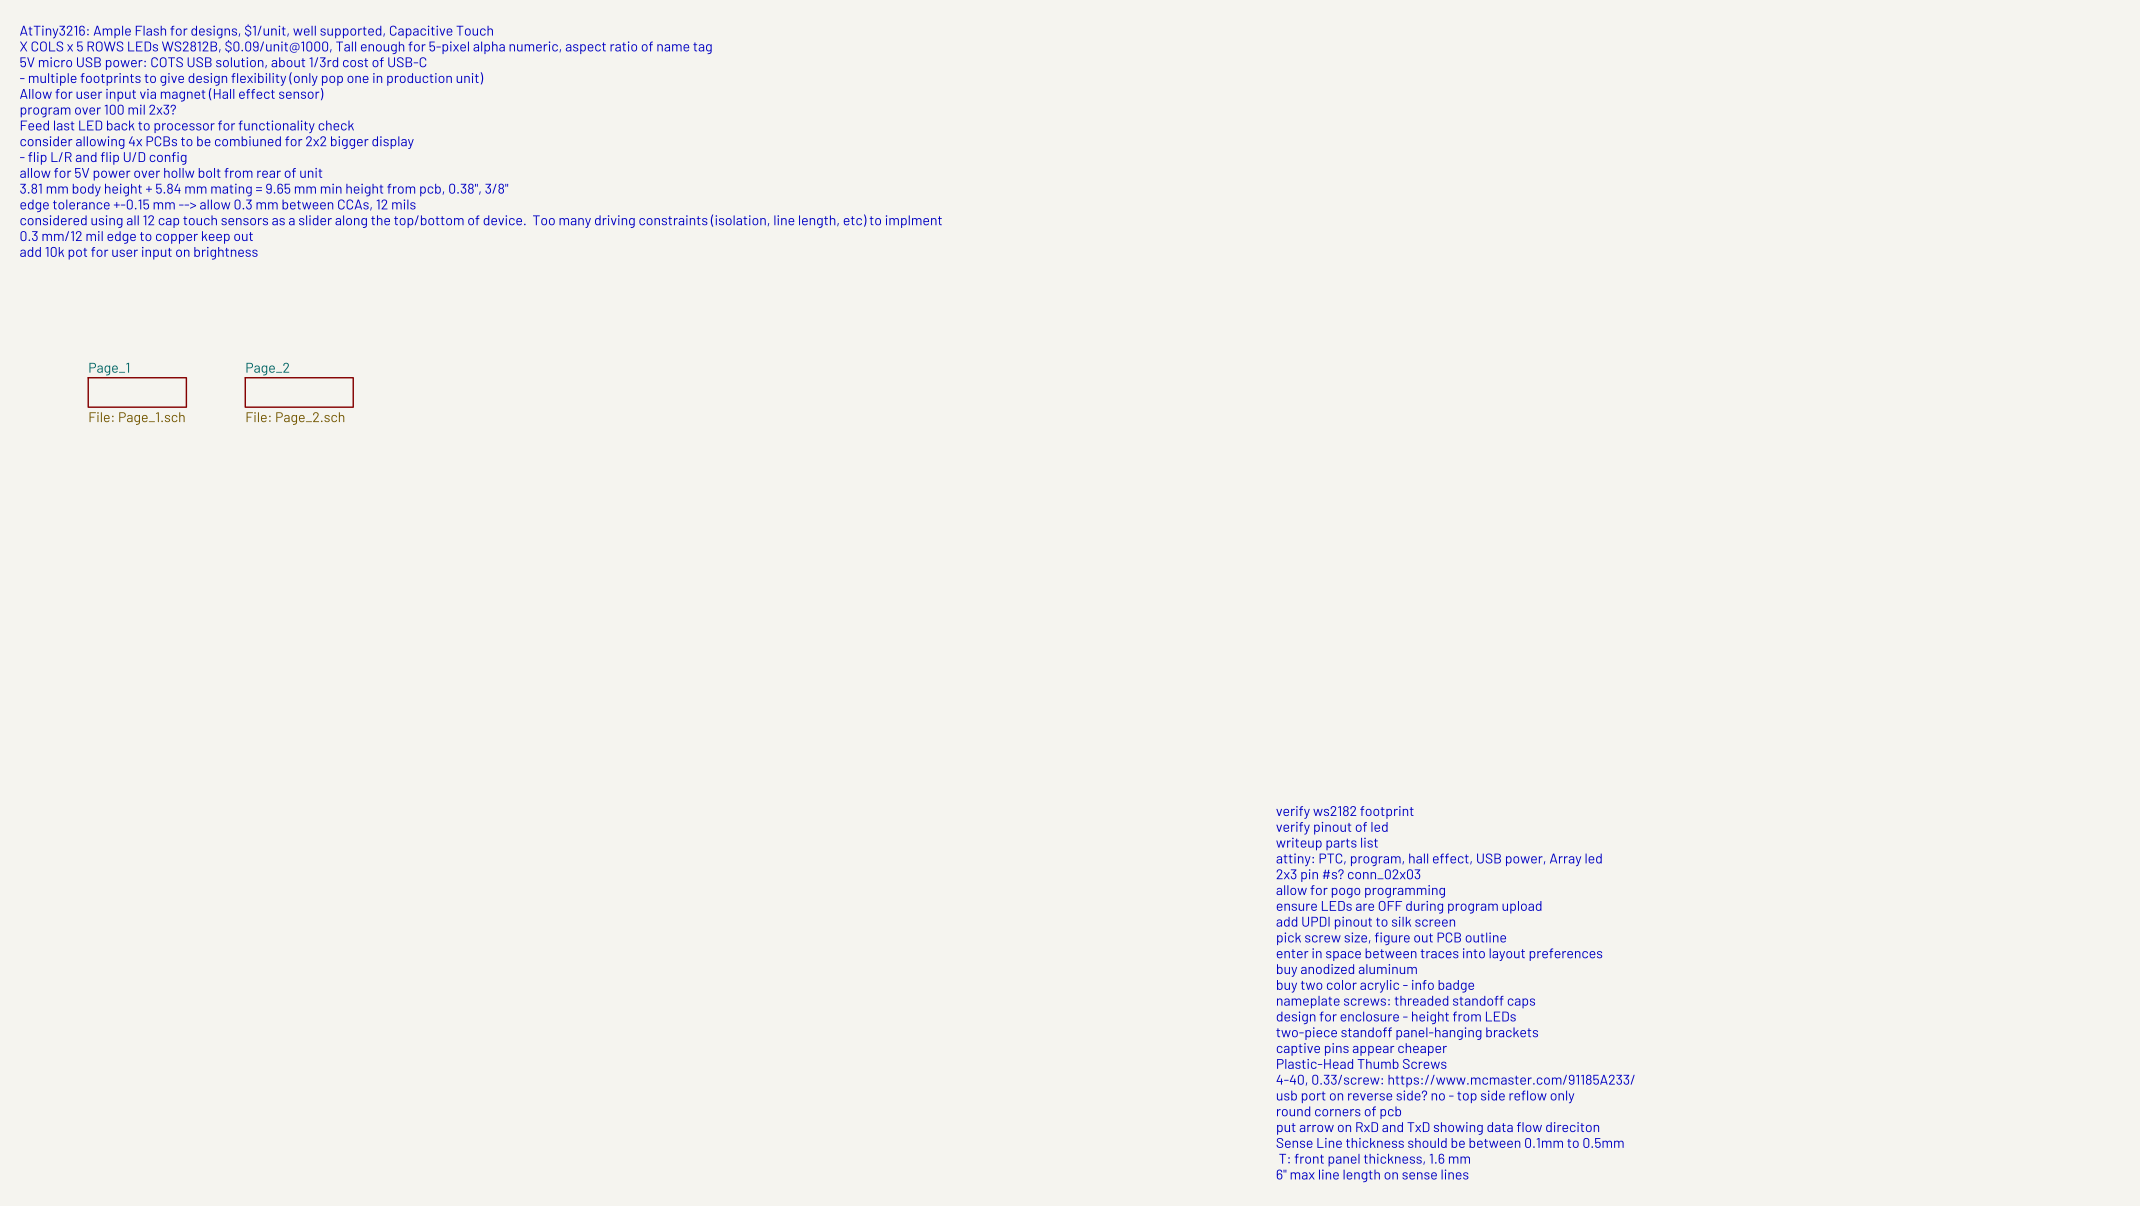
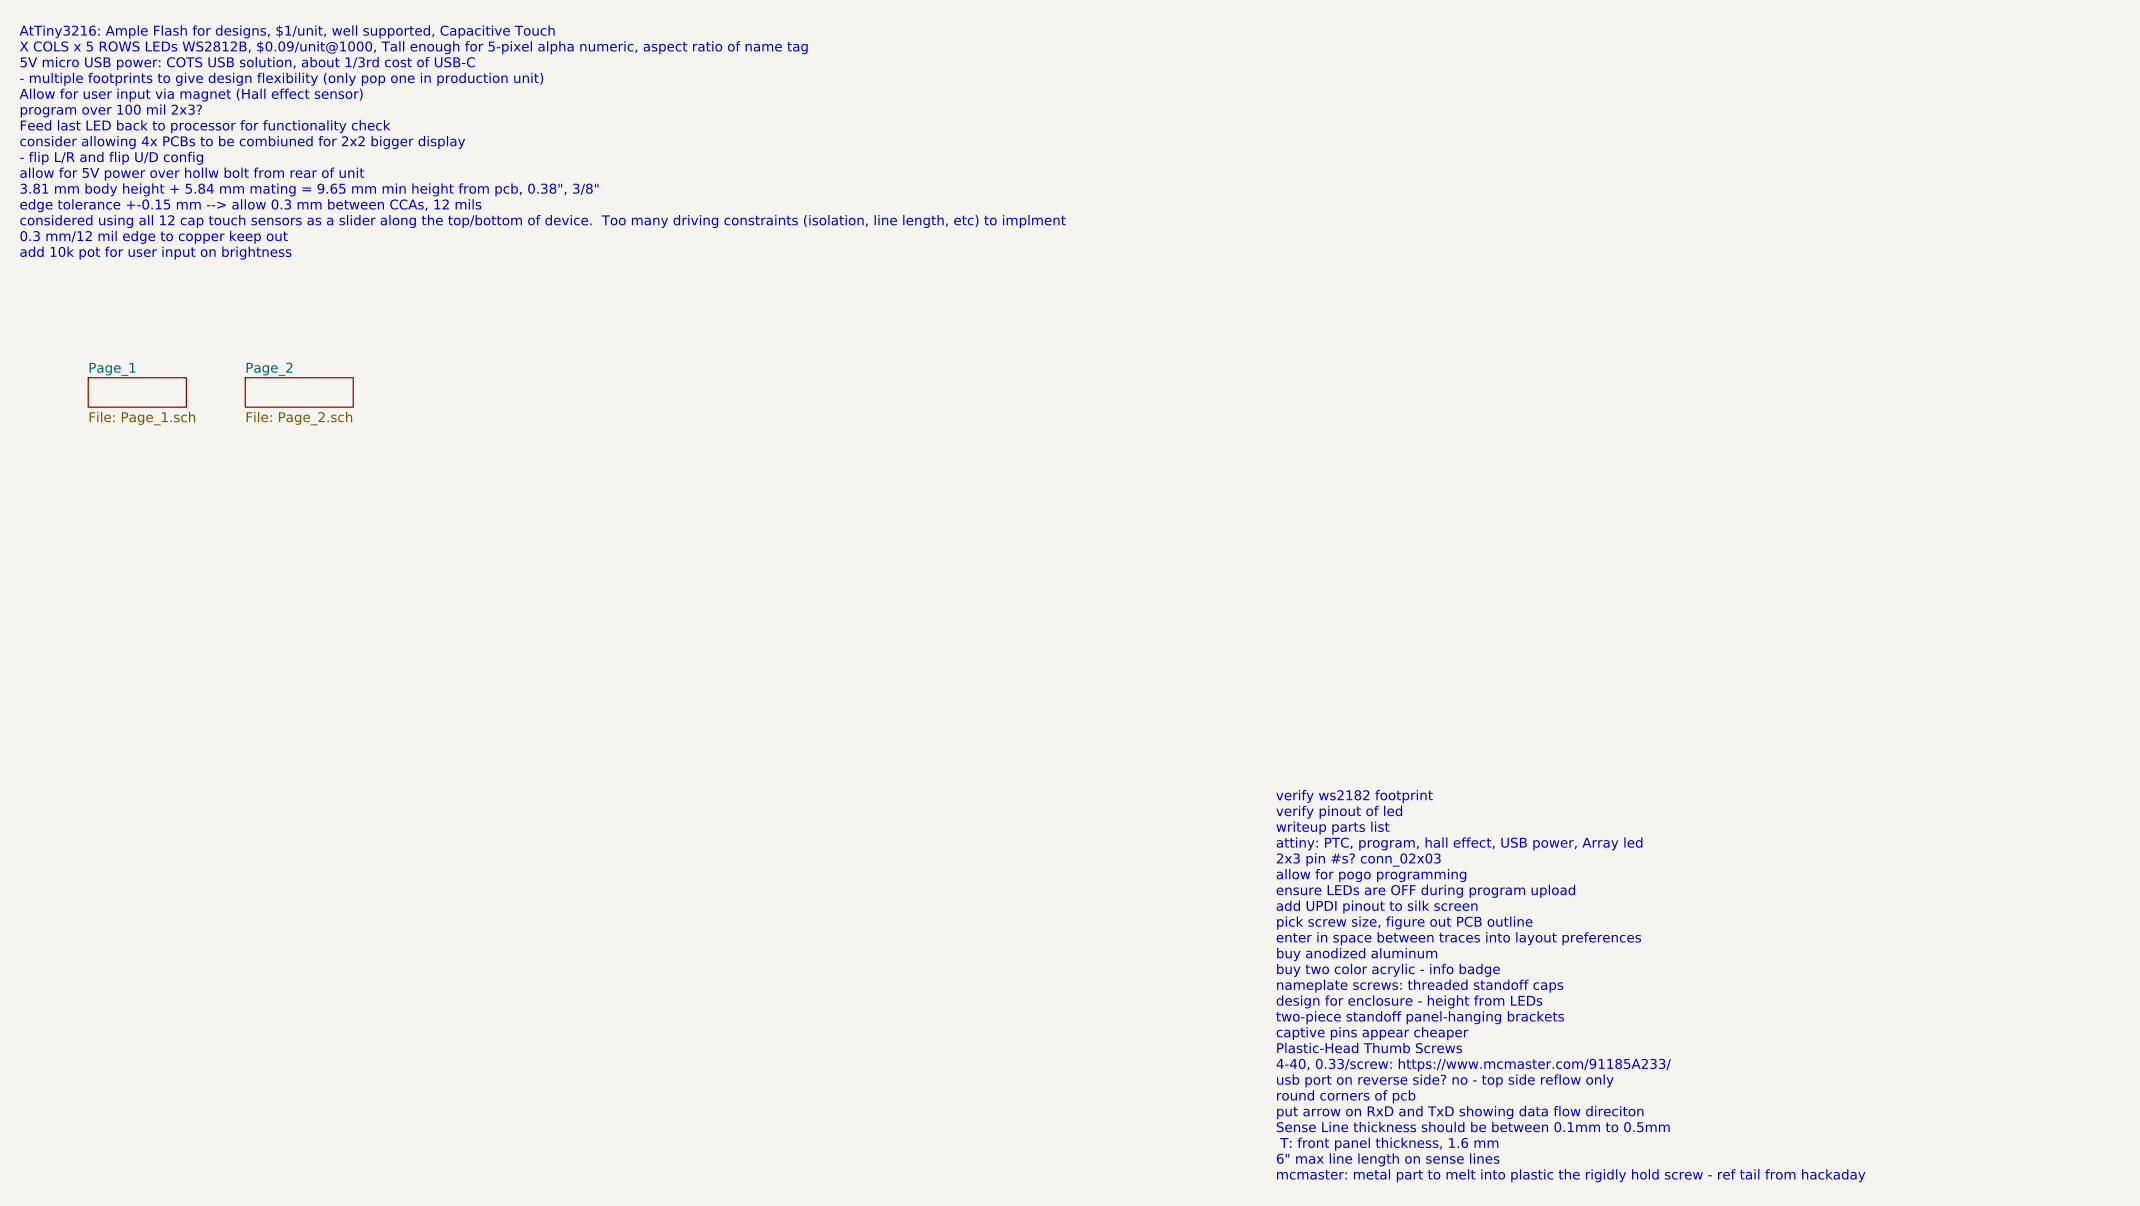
text: none -> verify ws2182 footprint (1354, 796)
text: verify ws2182 footprint (1344, 812) -> verify pinout of led (1339, 812)
text: verify pinout of led (1331, 828) -> writeup parts list (1332, 828)
text: writeup parts list (1327, 843) -> attiny: PTC, program, hall effect, USB power, Array led (1459, 843)
text: attiny: PTC, program, hall effect, USB power, Array led (1439, 859) -> 2x3 pin #s? conn_02x03 (1358, 859)
text: 2x3 pin #s? conn_02x03 (1348, 875) -> allow for pogo programming (1371, 875)
text: allow for pogo programming (1360, 891) -> ensure LEDs are OFF during program upload (1425, 891)
text: ensure LEDs are OFF during program upload (1409, 907) -> add UPDI pinout to silk screen (1377, 907)
text: add UPDI pinout to silk screen (1365, 923) -> pick screw size, figure out PCB outline (1404, 922)
text: pick screw size, figure out PCB outline (1391, 938) -> enter in space between traces into layout preferences (1458, 938)
text: enter in space between traces into layout preferences (1439, 954) -> buy anodized aluminum (1357, 954)
text: buy anodized aluminum (1346, 970) -> buy two color acrylic - info badge (1388, 970)
text: buy two color acrylic - info badge (1375, 986) -> nameplate screws: threaded standoff caps (1420, 986)
text: nameplate screws: threaded standoff caps (1406, 1002) -> design for enclosure - height from LEDs (1409, 1001)
text: design for enclosure - height from LEDs (1396, 1017) -> two-piece standoff panel-hanging brackets (1420, 1017)
text: two-piece standoff panel-hanging brackets (1407, 1033) -> captive pins appear cheaper (1372, 1033)
text: captive pins appear cheaper (1361, 1049) -> Plastic-Head Thumb Screws (1369, 1048)
text: Plastic-Head Thumb Screws (1361, 1063) -> 4-40, 0.33/screw: https://www.mcmaster.com/91185A233/ (1473, 1065)
text: 4-40, 0.33/screw: https://www.mcmaster.com/91185A233/ (1455, 1081) -> usb port on reverse side? no - top side reflow only (1445, 1080)
text: usb port on reverse side? no - top side reflow only (1425, 1096) -> round corners of pcb (1346, 1096)
text: round corners of pcb (1339, 1112) -> put arrow on RxD and TxD showing data flow direciton (1460, 1112)
text: put arrow on RxD and TxD showing data flow direciton (1438, 1128) -> Sense Line thickness should be between 0.1mm to 0.5mm (1473, 1127)
text: Sense Line thickness should be between 0.1mm to 0.5mm (1450, 1142) -> T: front panel thickness, 1.6 mm (1389, 1144)
text: T: front panel thickness, 1.6 mm (1374, 1160) -> 6" max line length on sense lines (1388, 1159)
text: 6" max line length on sense lines (1372, 1175) -> mcmaster: metal part to melt into plastic the rigidly hold screw - ref tail from hackaday (1571, 1175)

